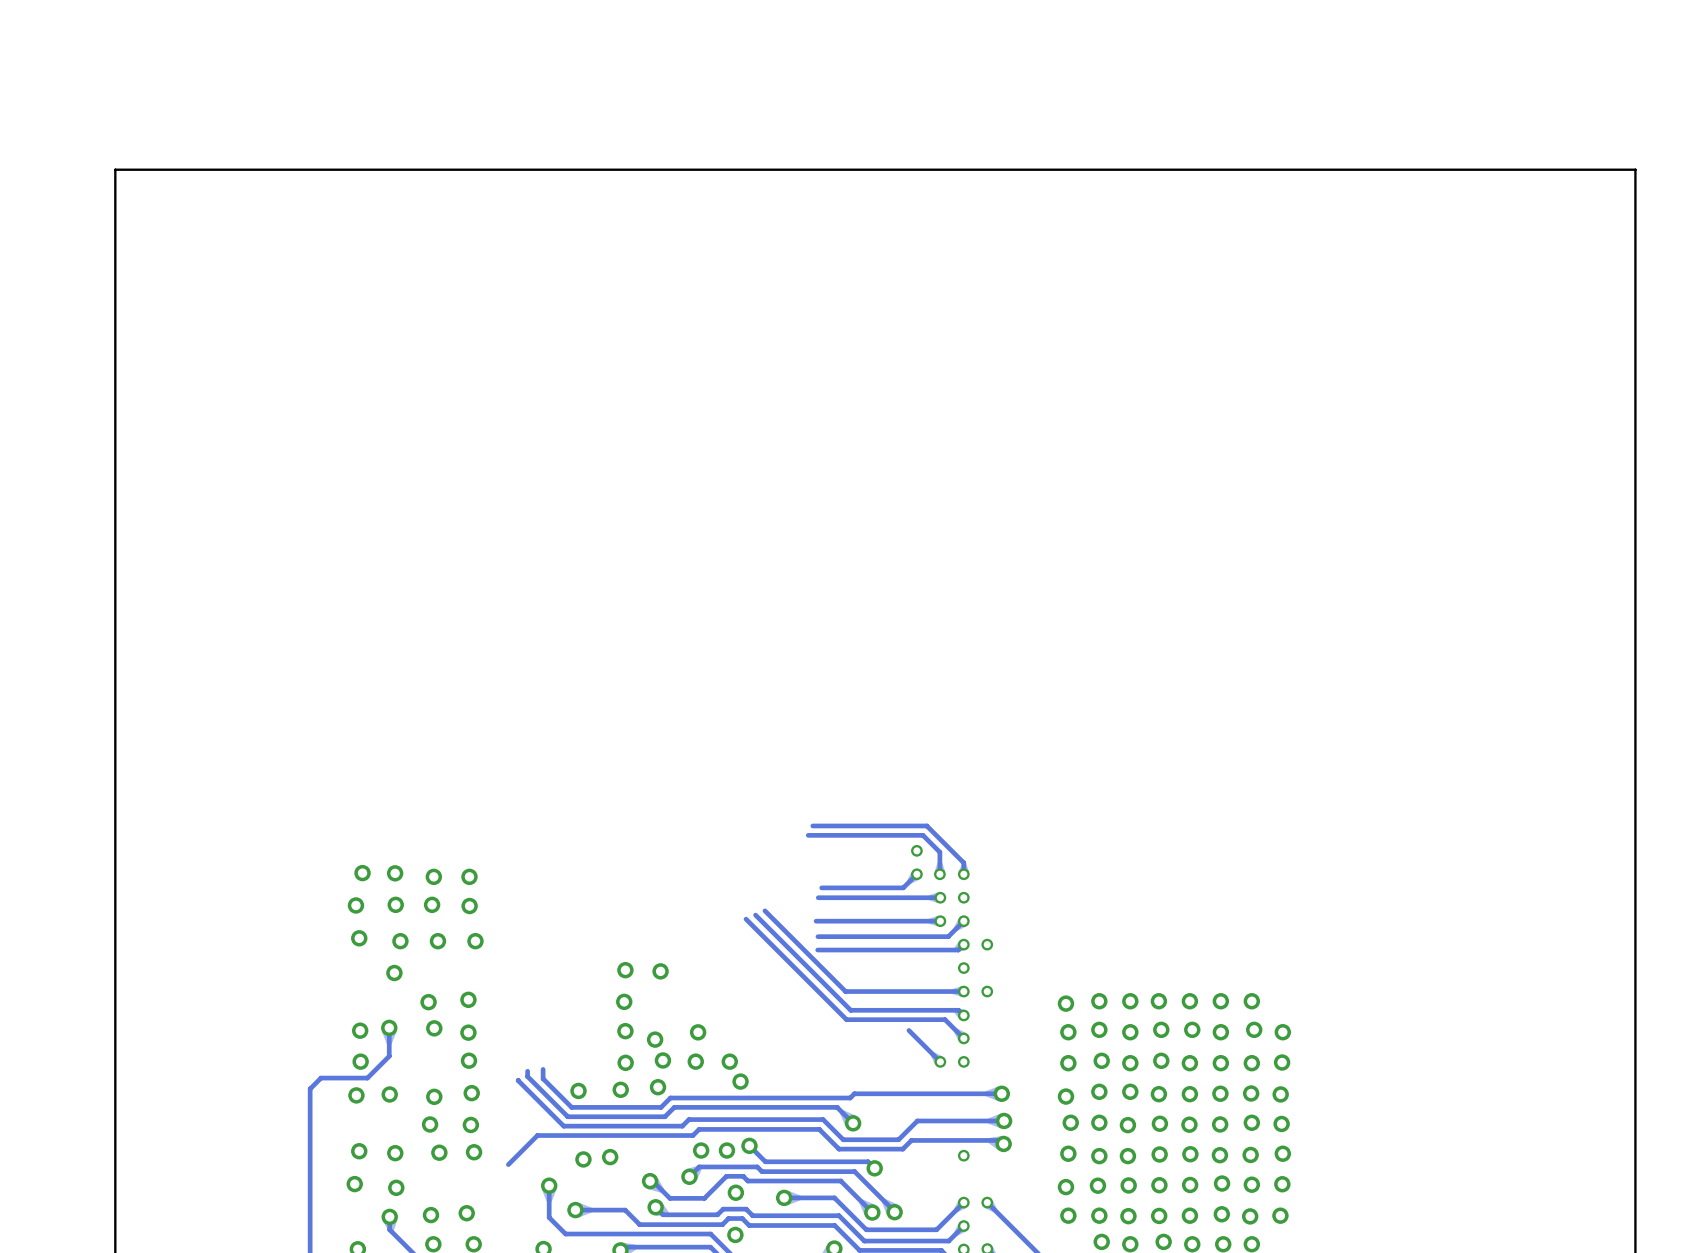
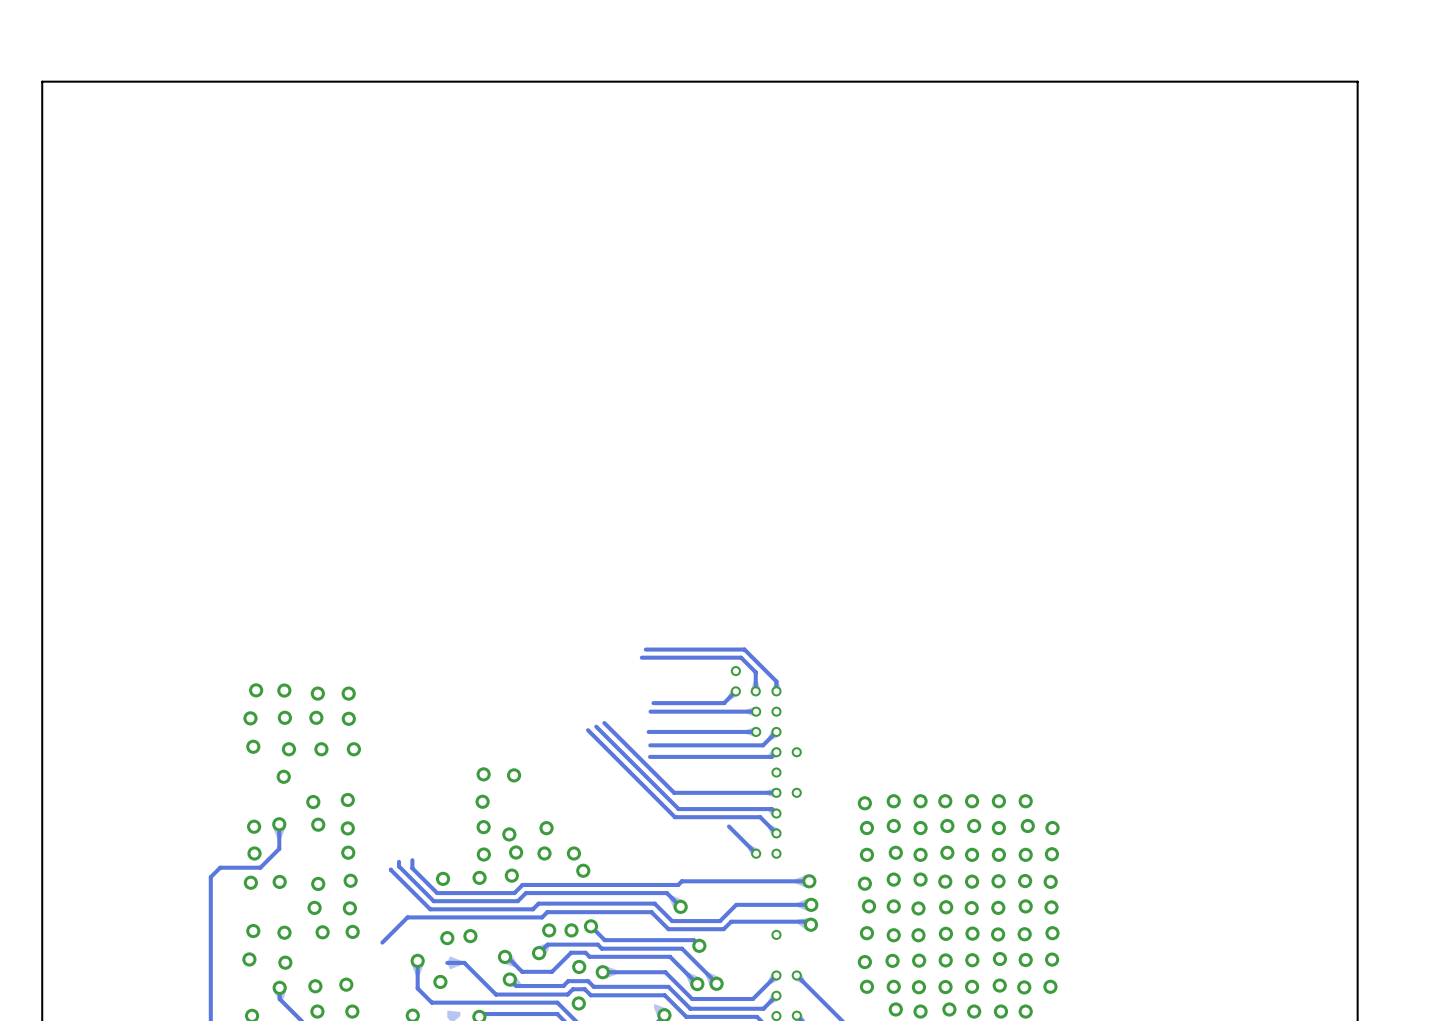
track: (784, 1197) (835, 1198) -> (602, 972) (665, 972)
via position: (784, 1197) -> (602, 972)
track: (625, 1210) (575, 1210) -> (483, 981) (464, 962) (447, 962)

